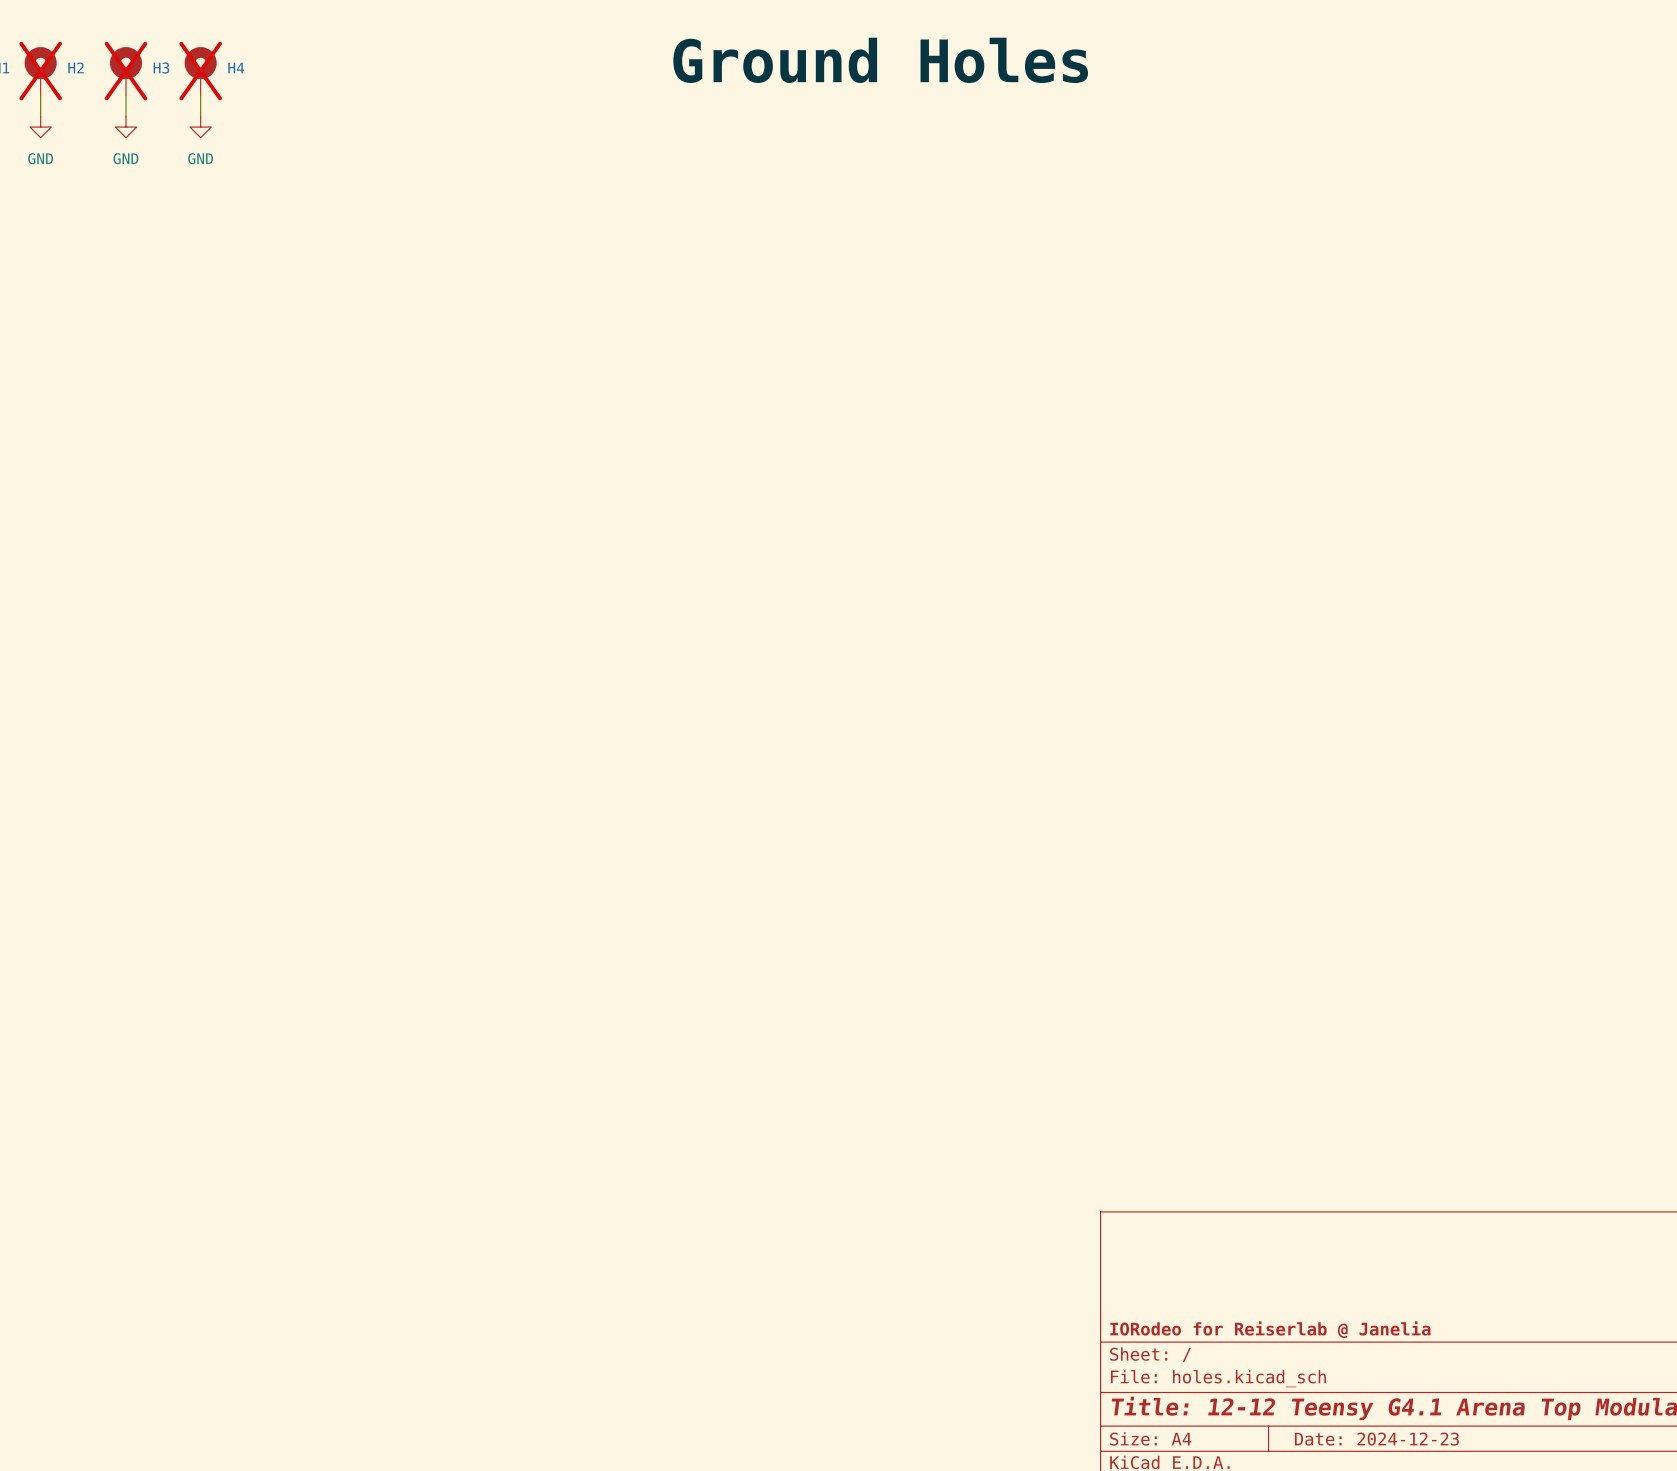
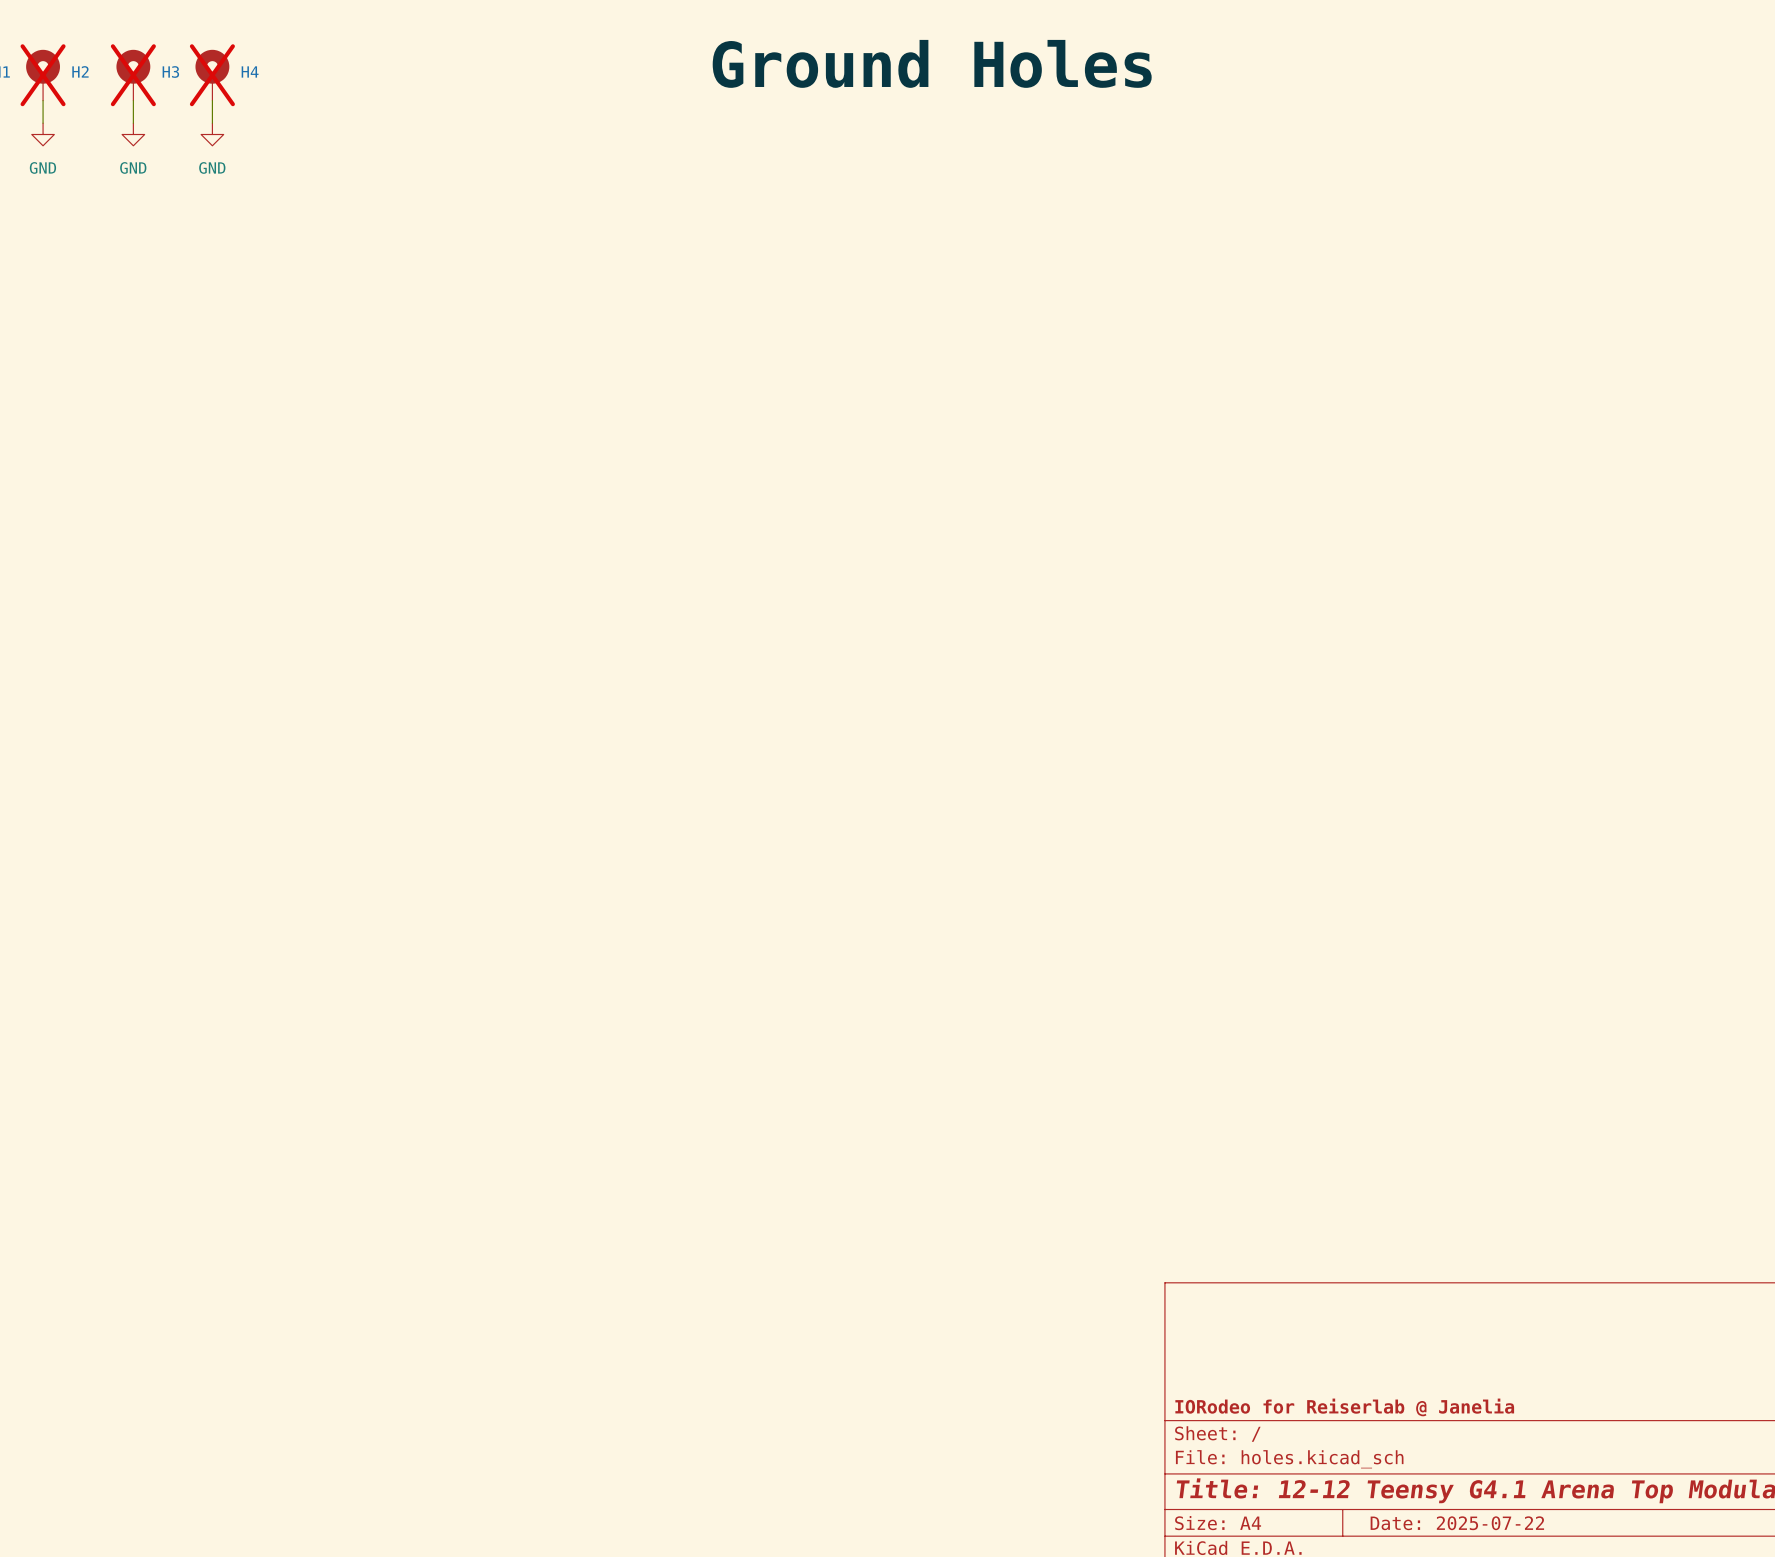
title block: Date: 2024-12-23 (1376, 1439) -> Date: 2025-07-22 (1457, 1523)

